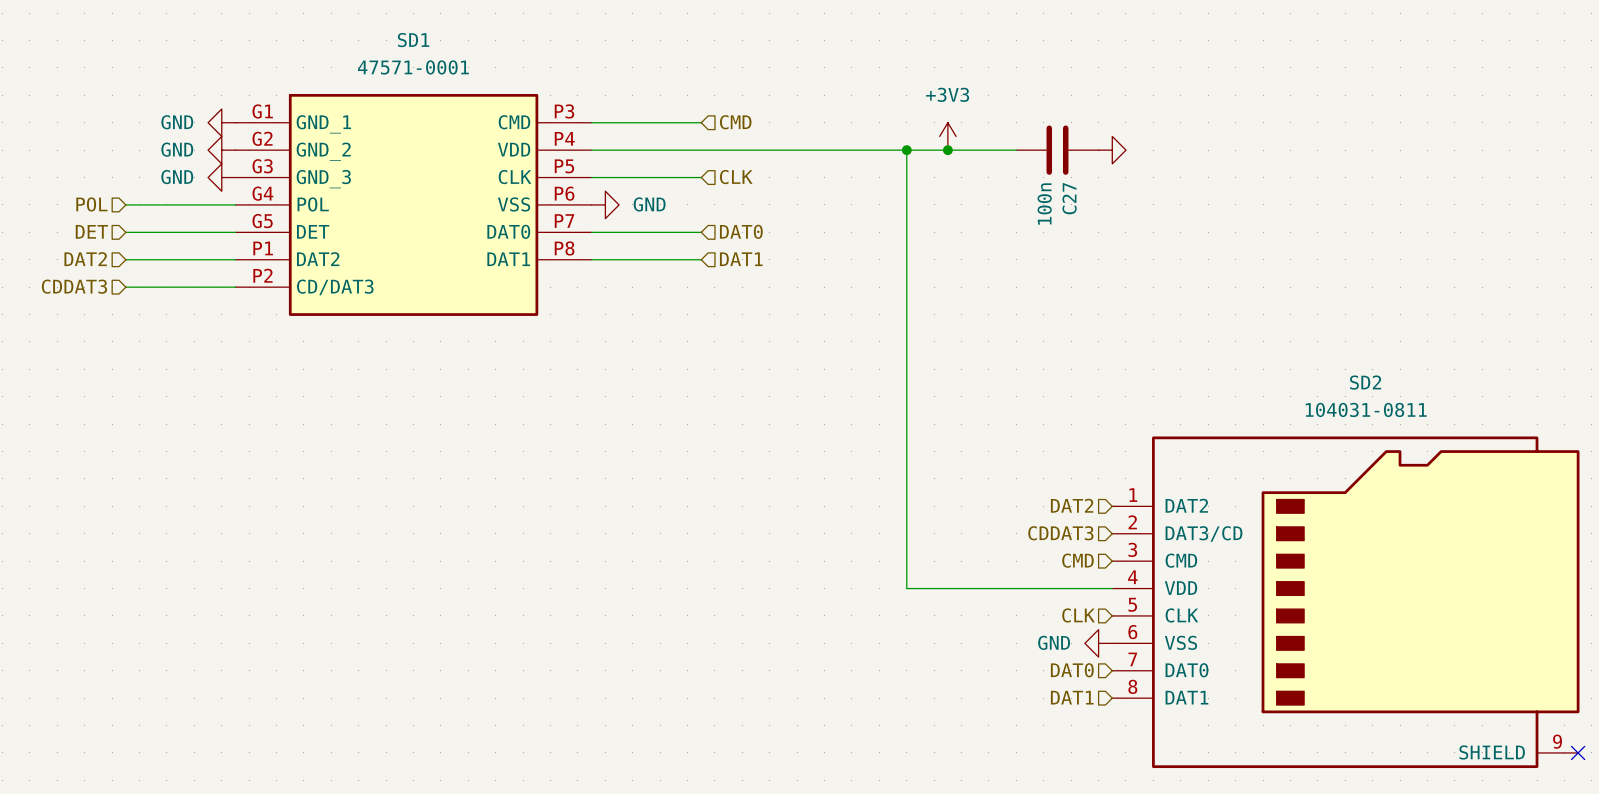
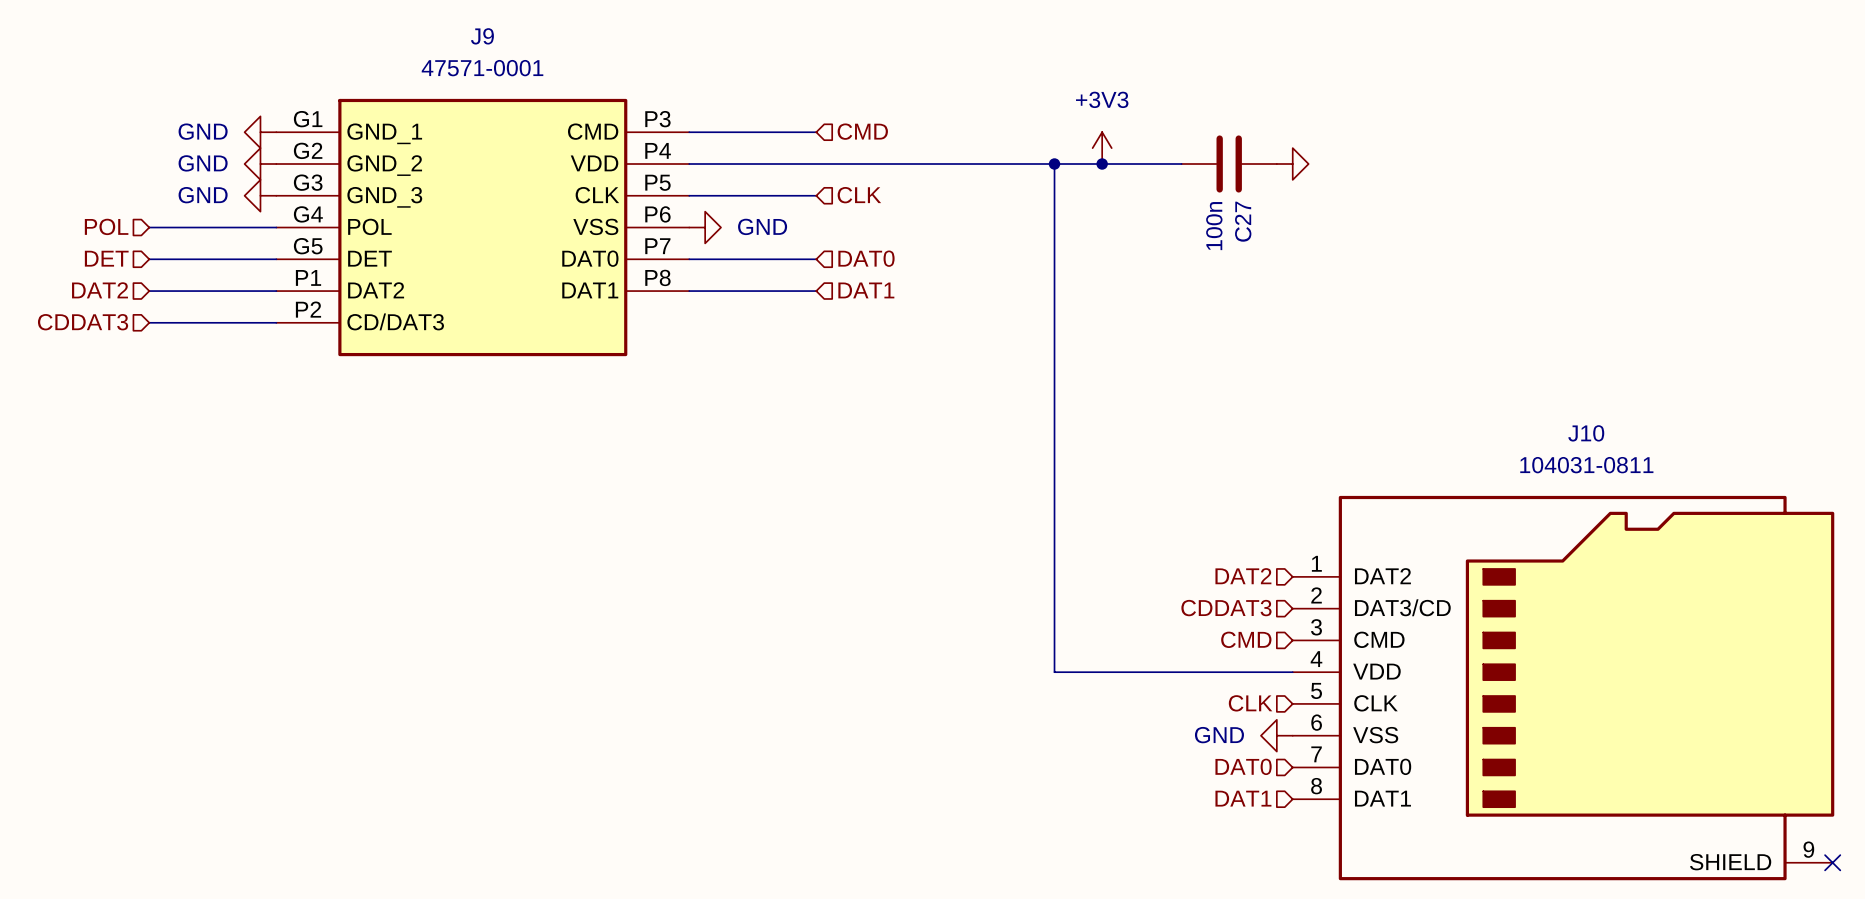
SD1 name: SD1 (413, 40) -> J9 (482, 36)
SD2 name: SD2 (1365, 382) -> J10 (1586, 433)

